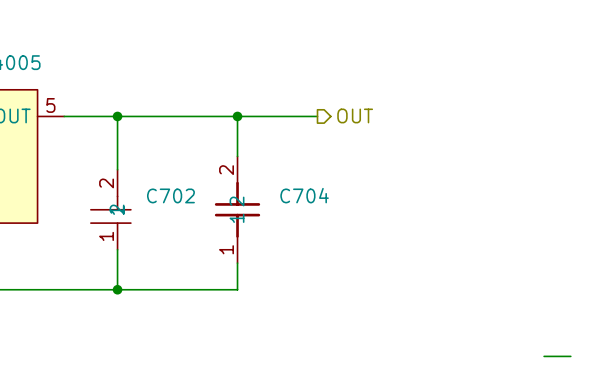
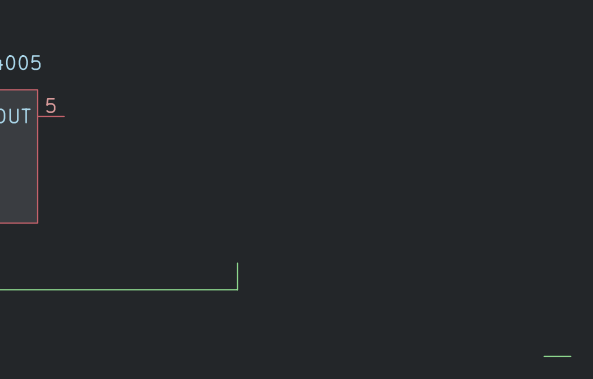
hierarchical label: OUT (355, 115) -> none
wire: (64, 116) (317, 116) -> none
wire: (117, 116) (117, 169) -> none
junction: (117, 116) -> none
wire: (237, 116) (237, 156) -> none
junction: (237, 116) -> none
C702: (110, 209) -> none
C704: (237, 209) -> none
wire: (117, 249) (117, 289) -> none
junction: (117, 289) -> none

